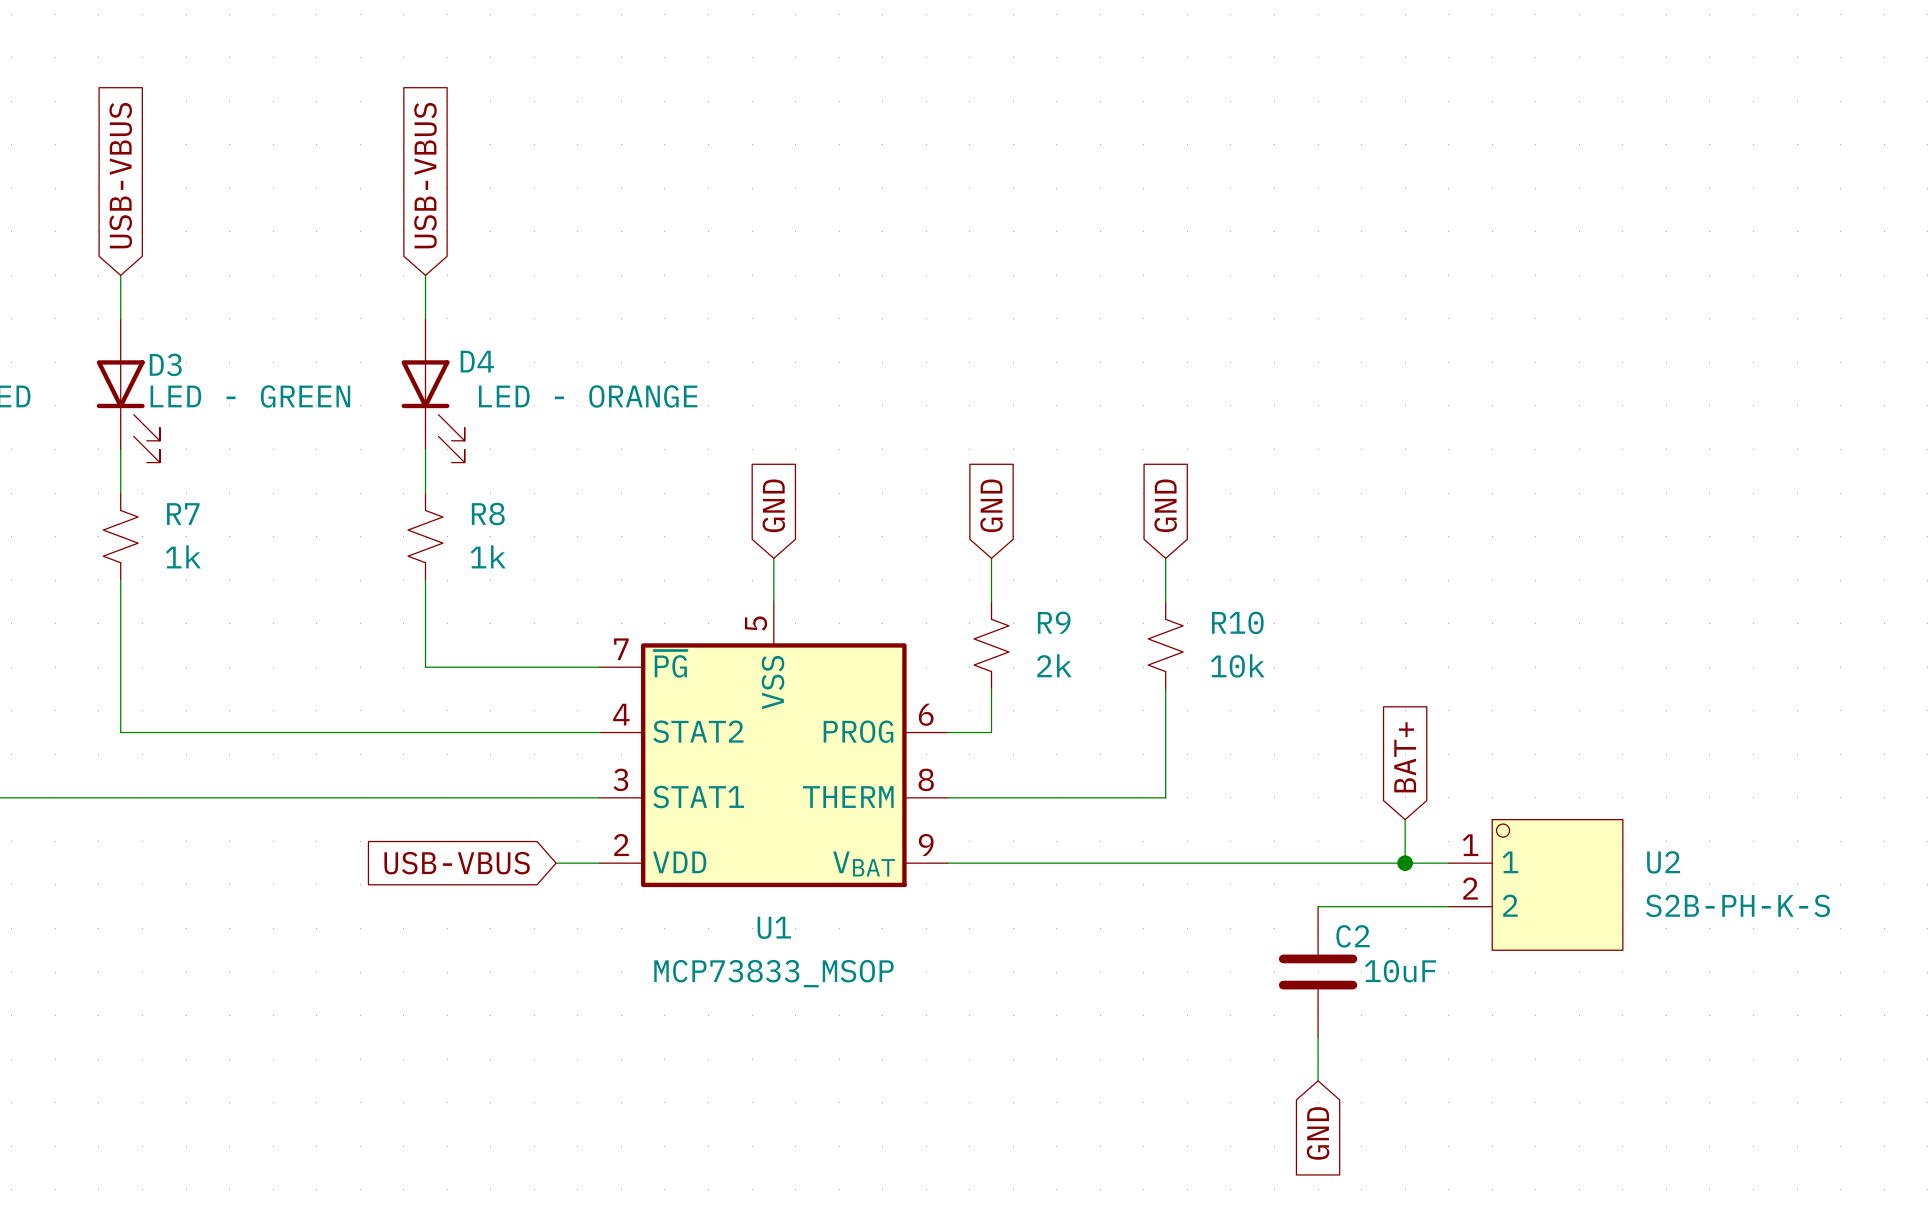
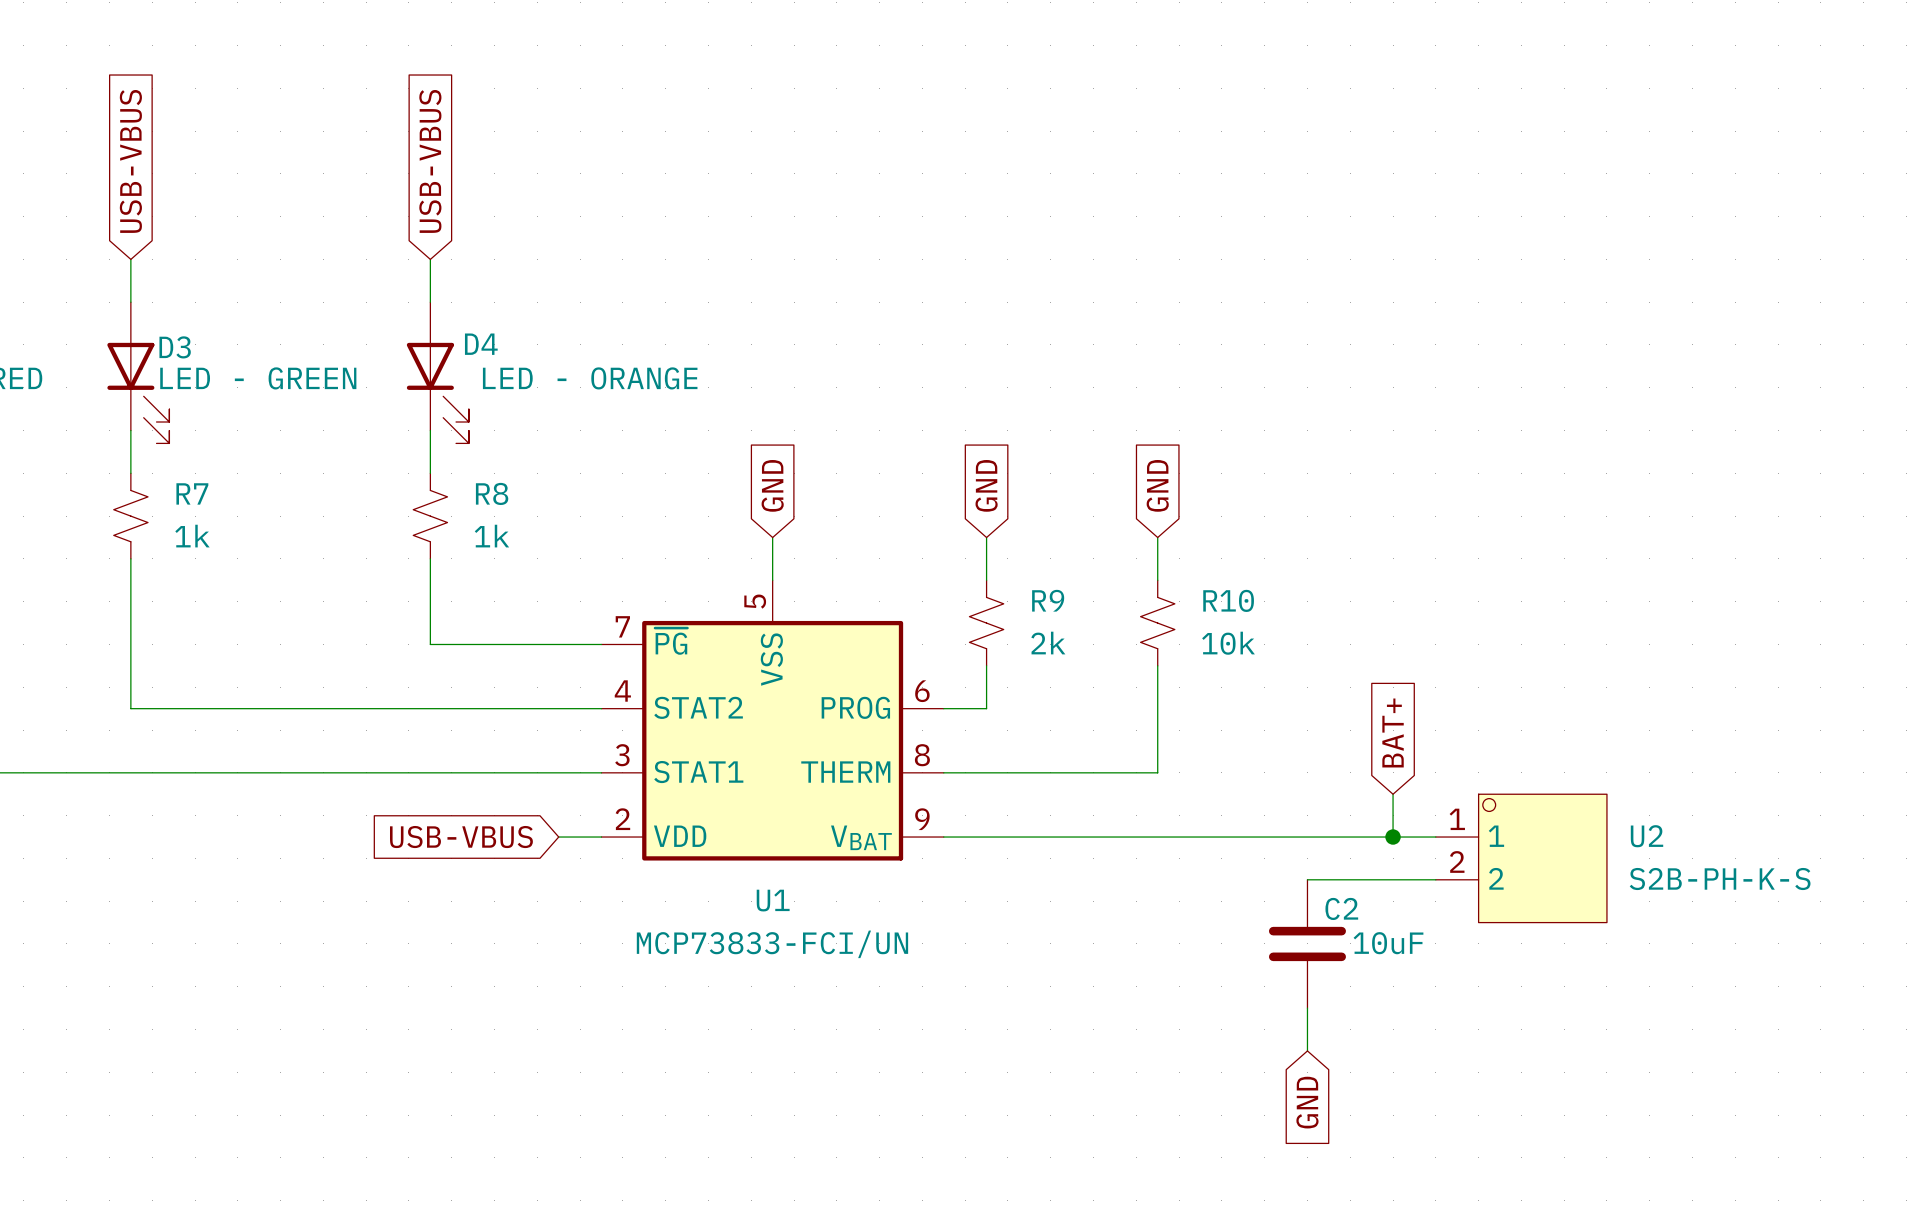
U1 value: MCP73833_MSOP (773, 973) -> MCP73833-FCI/UN (772, 944)

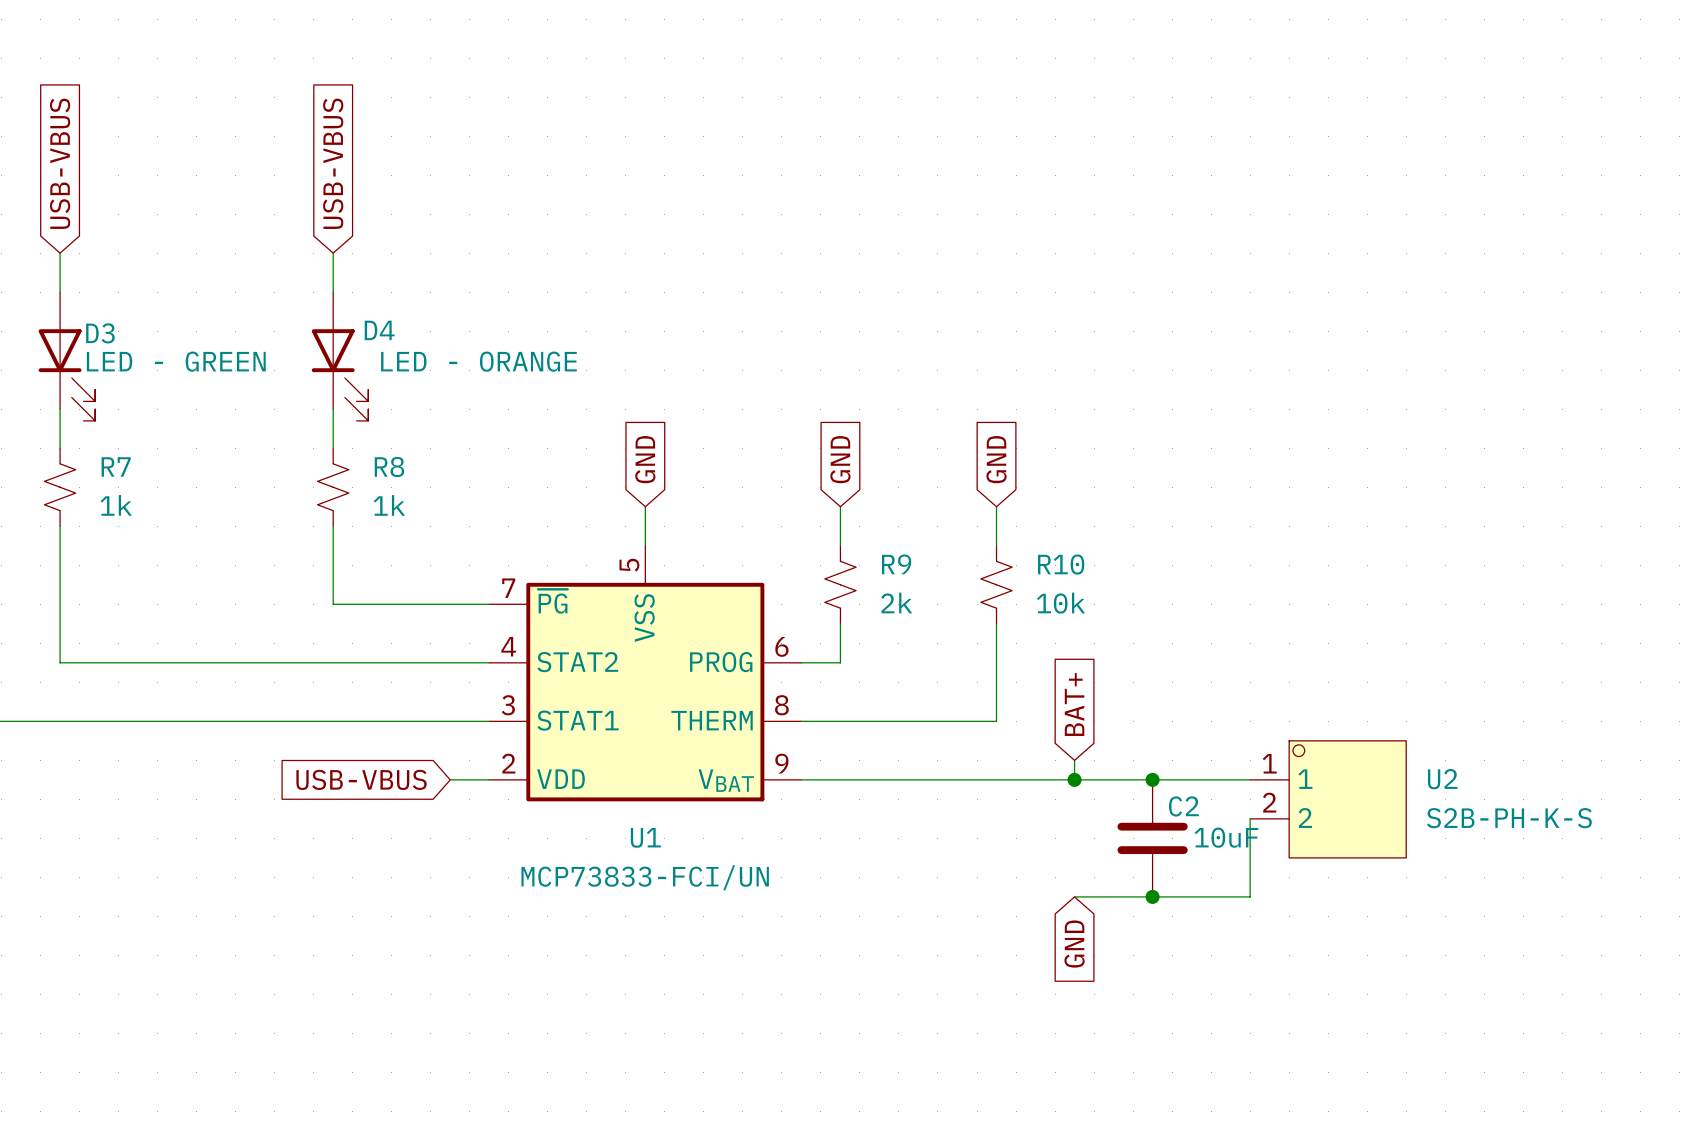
global label position: BAT+ (1393, 732) -> BAT+ (1074, 704)
wire: (1393, 794) (1393, 837) -> none
wire: none -> (1074, 760) (1074, 779)
junction: none -> (1074, 779)
junction position: (1393, 837) -> (1152, 779)
wire: (1307, 879) (1435, 879) -> (1074, 896) (1250, 896) (1250, 818)
C2 position: (1307, 943) -> (1152, 838)
junction: none -> (1152, 896)
wire: (1307, 1008) (1307, 1050) -> none
global label position: GND (1307, 1102) -> GND (1074, 944)

